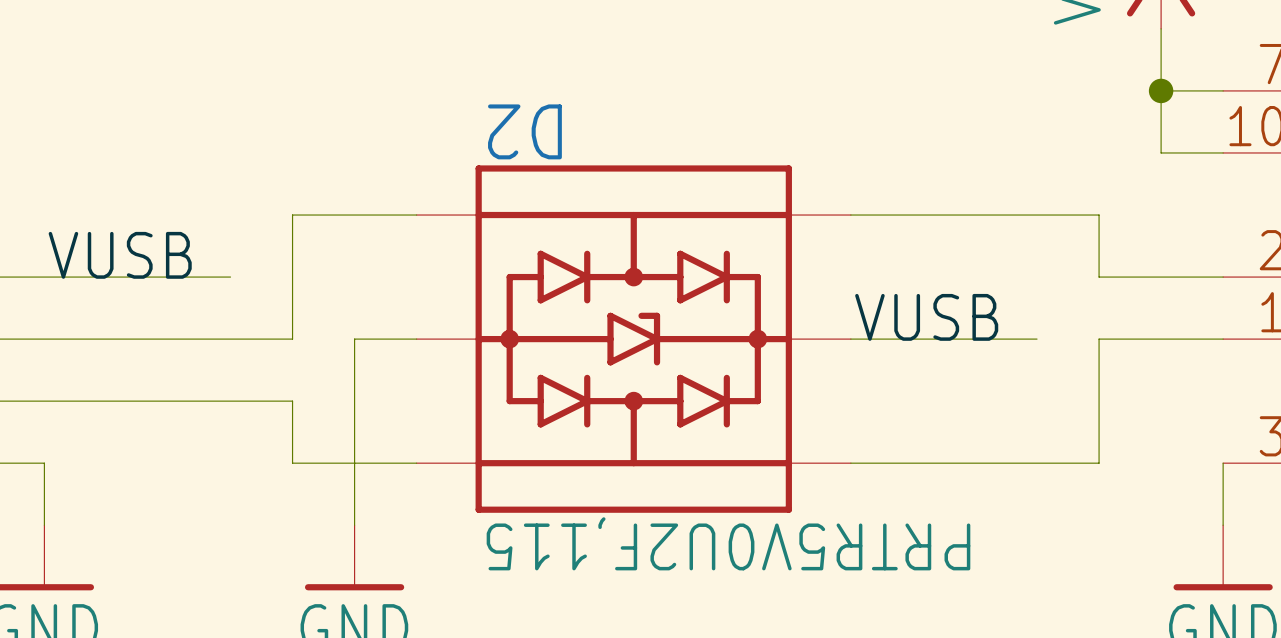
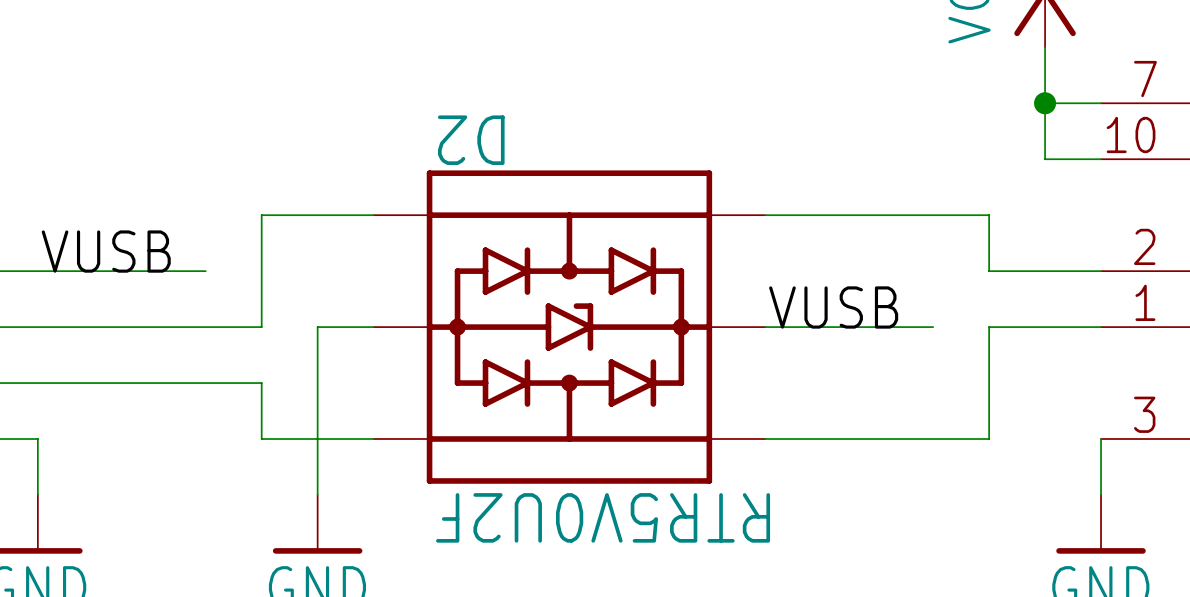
D2 value: PRTR5V0U2F,115 (728, 543) -> RTR5V0U2F (603, 517)

